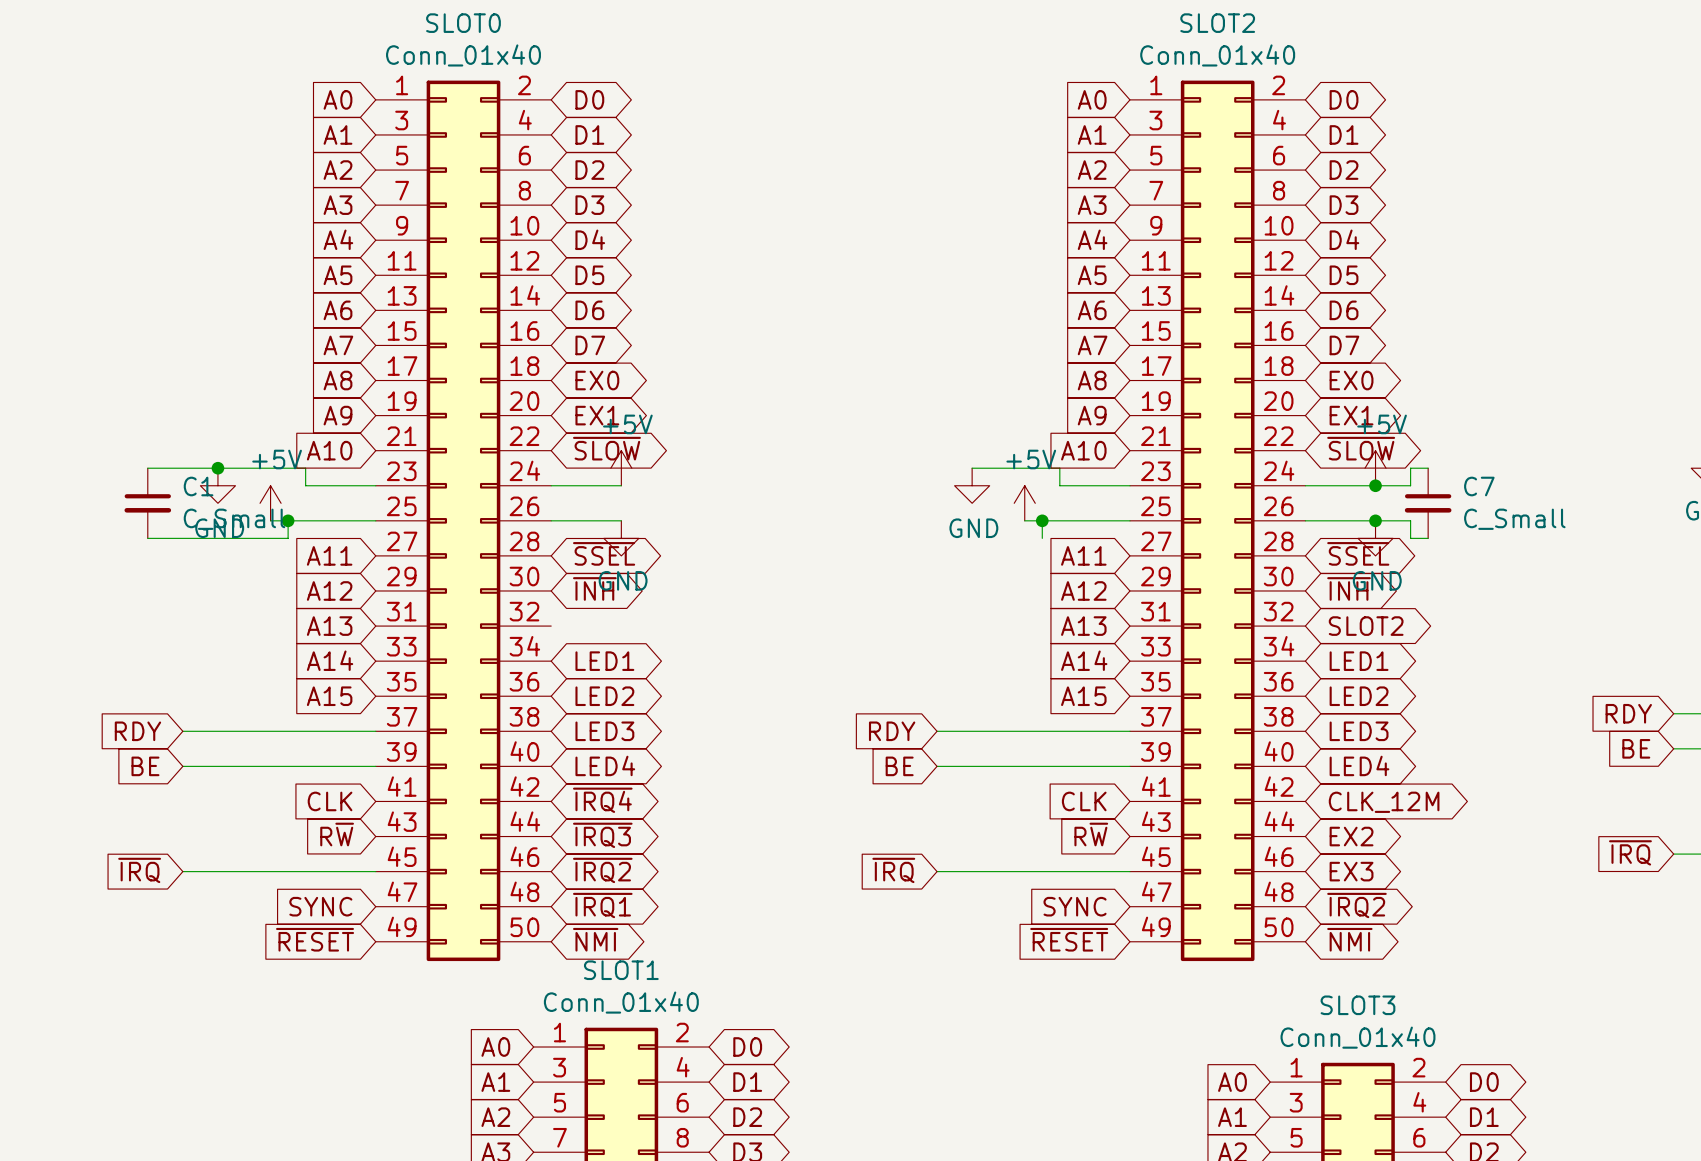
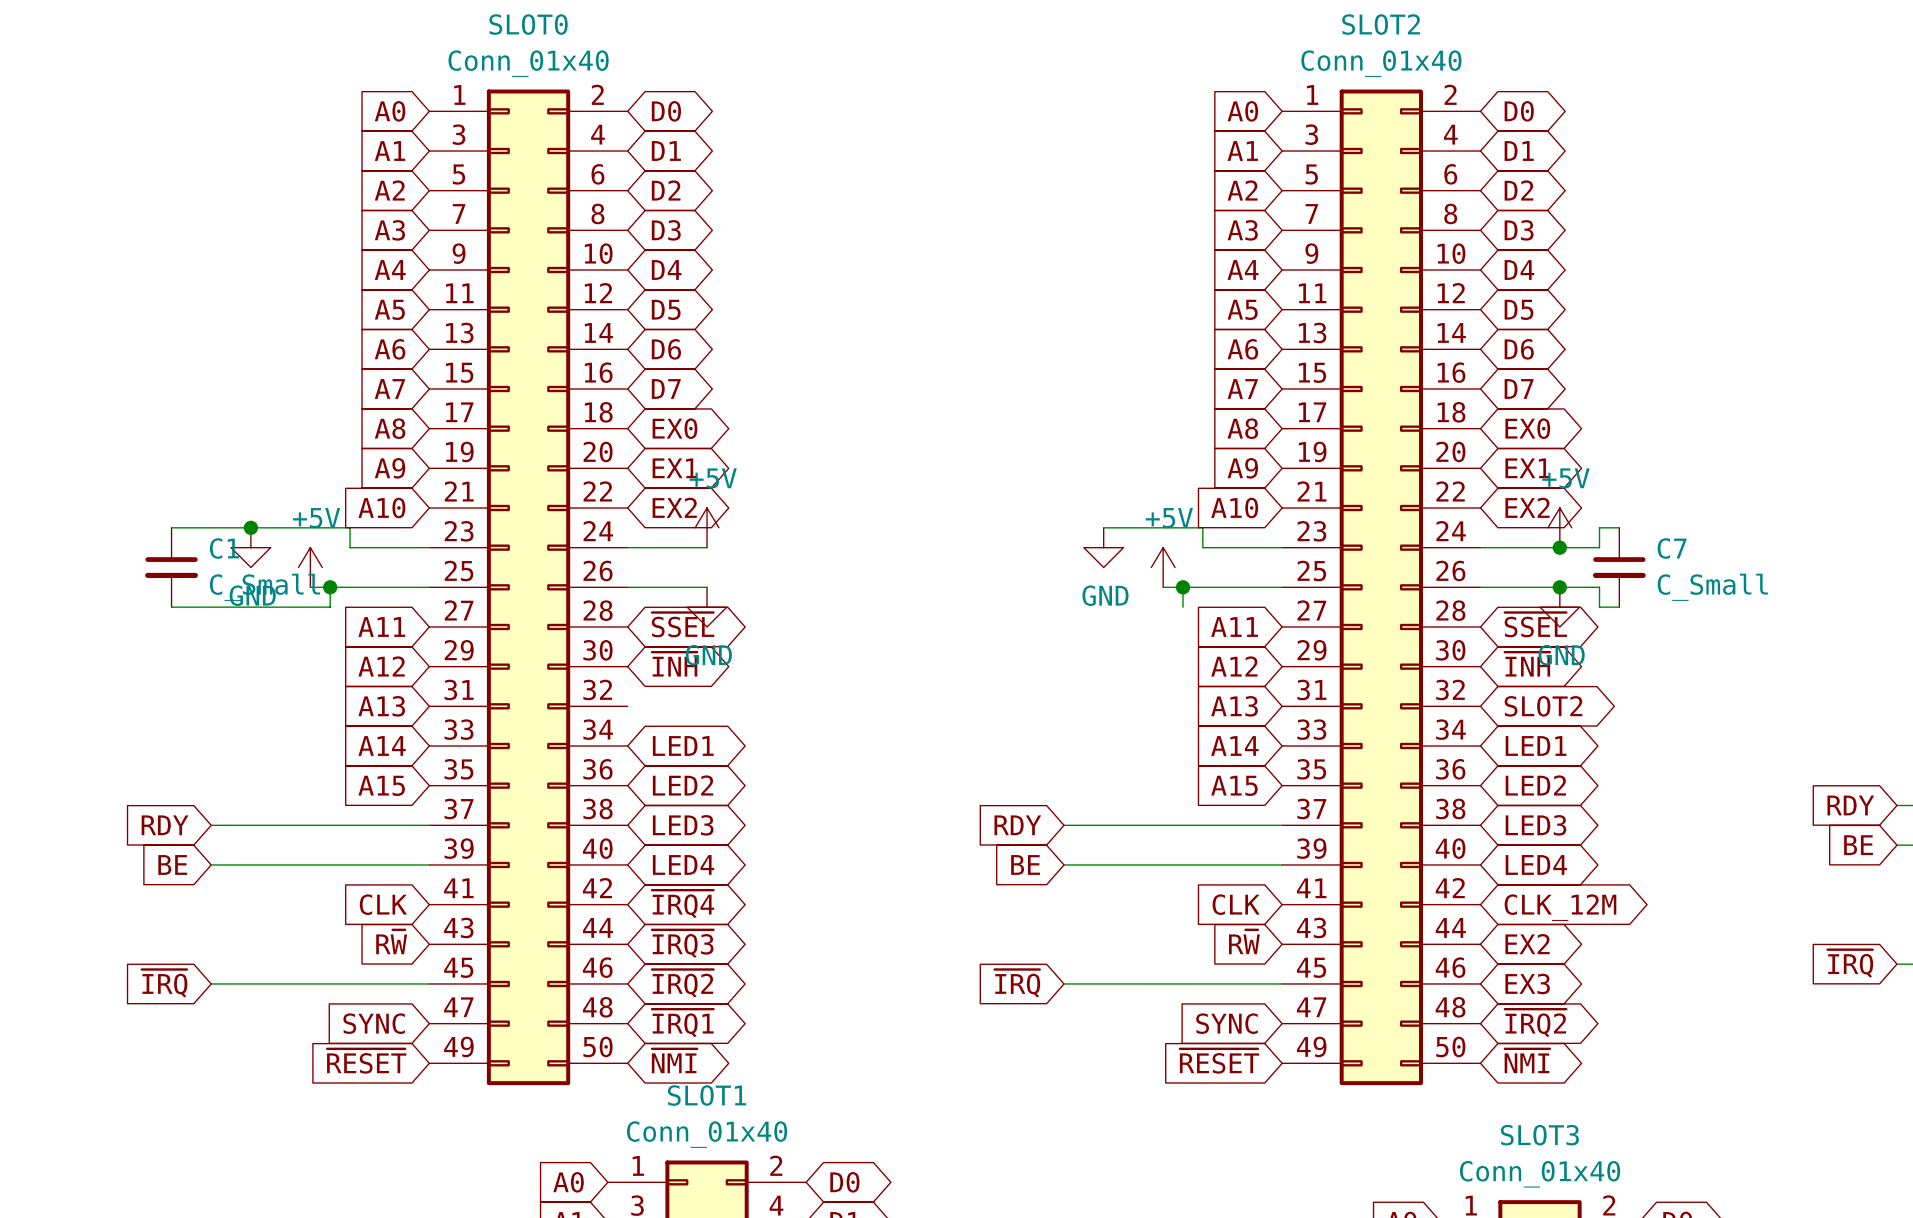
global label: ~{SLOW} (606, 448) -> EX2 (674, 507)
global label: ~{SLOW} (1361, 448) -> EX2 (1527, 507)

